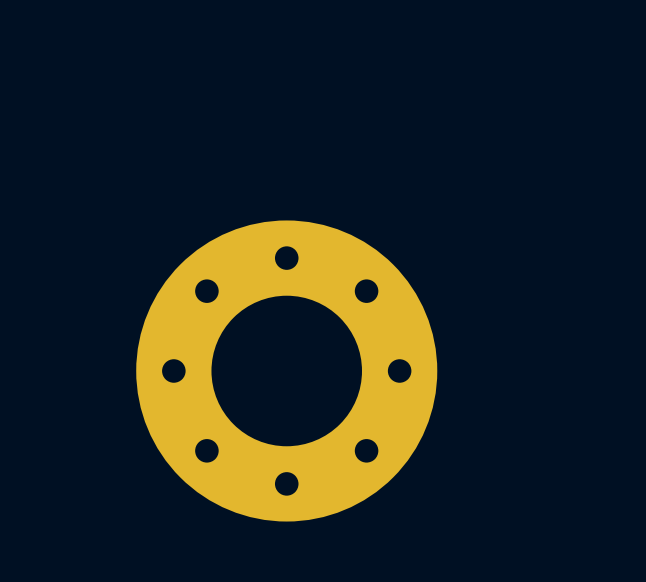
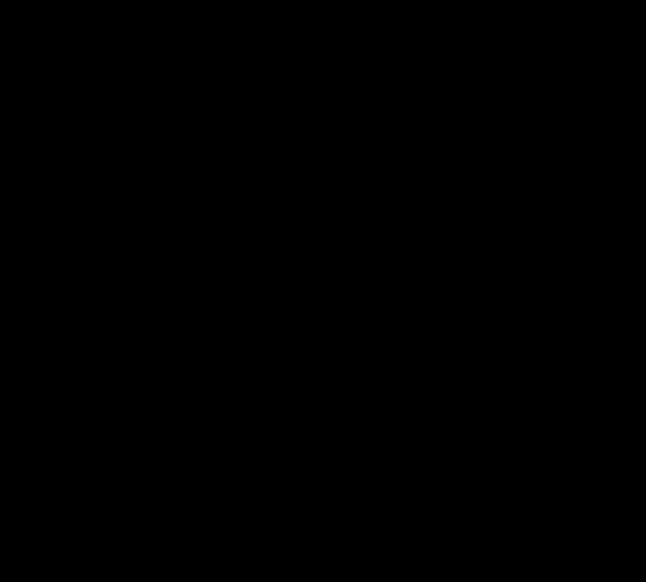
part: (286, 370) -> none

